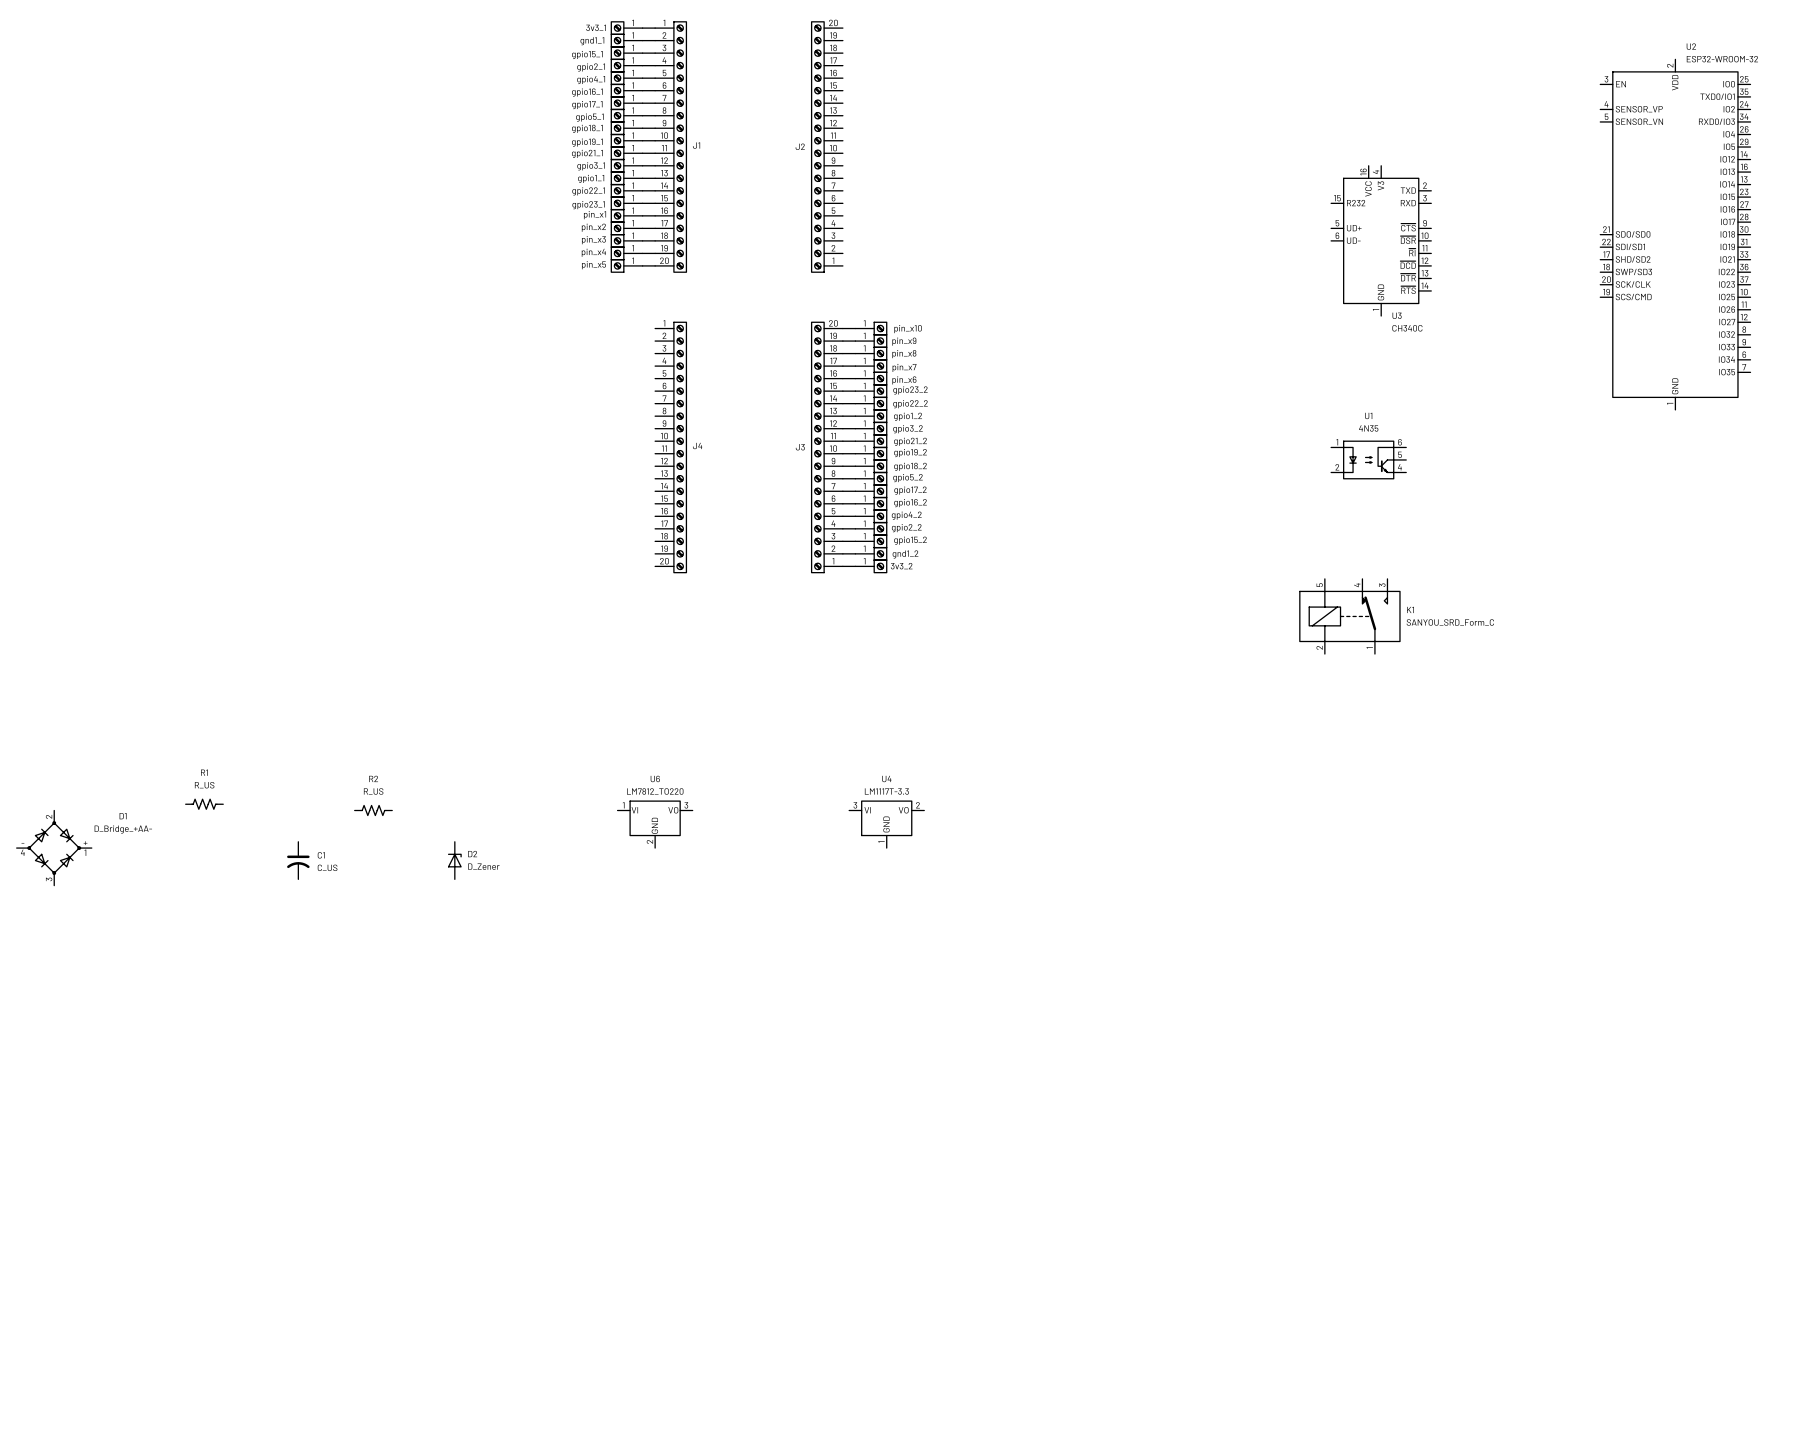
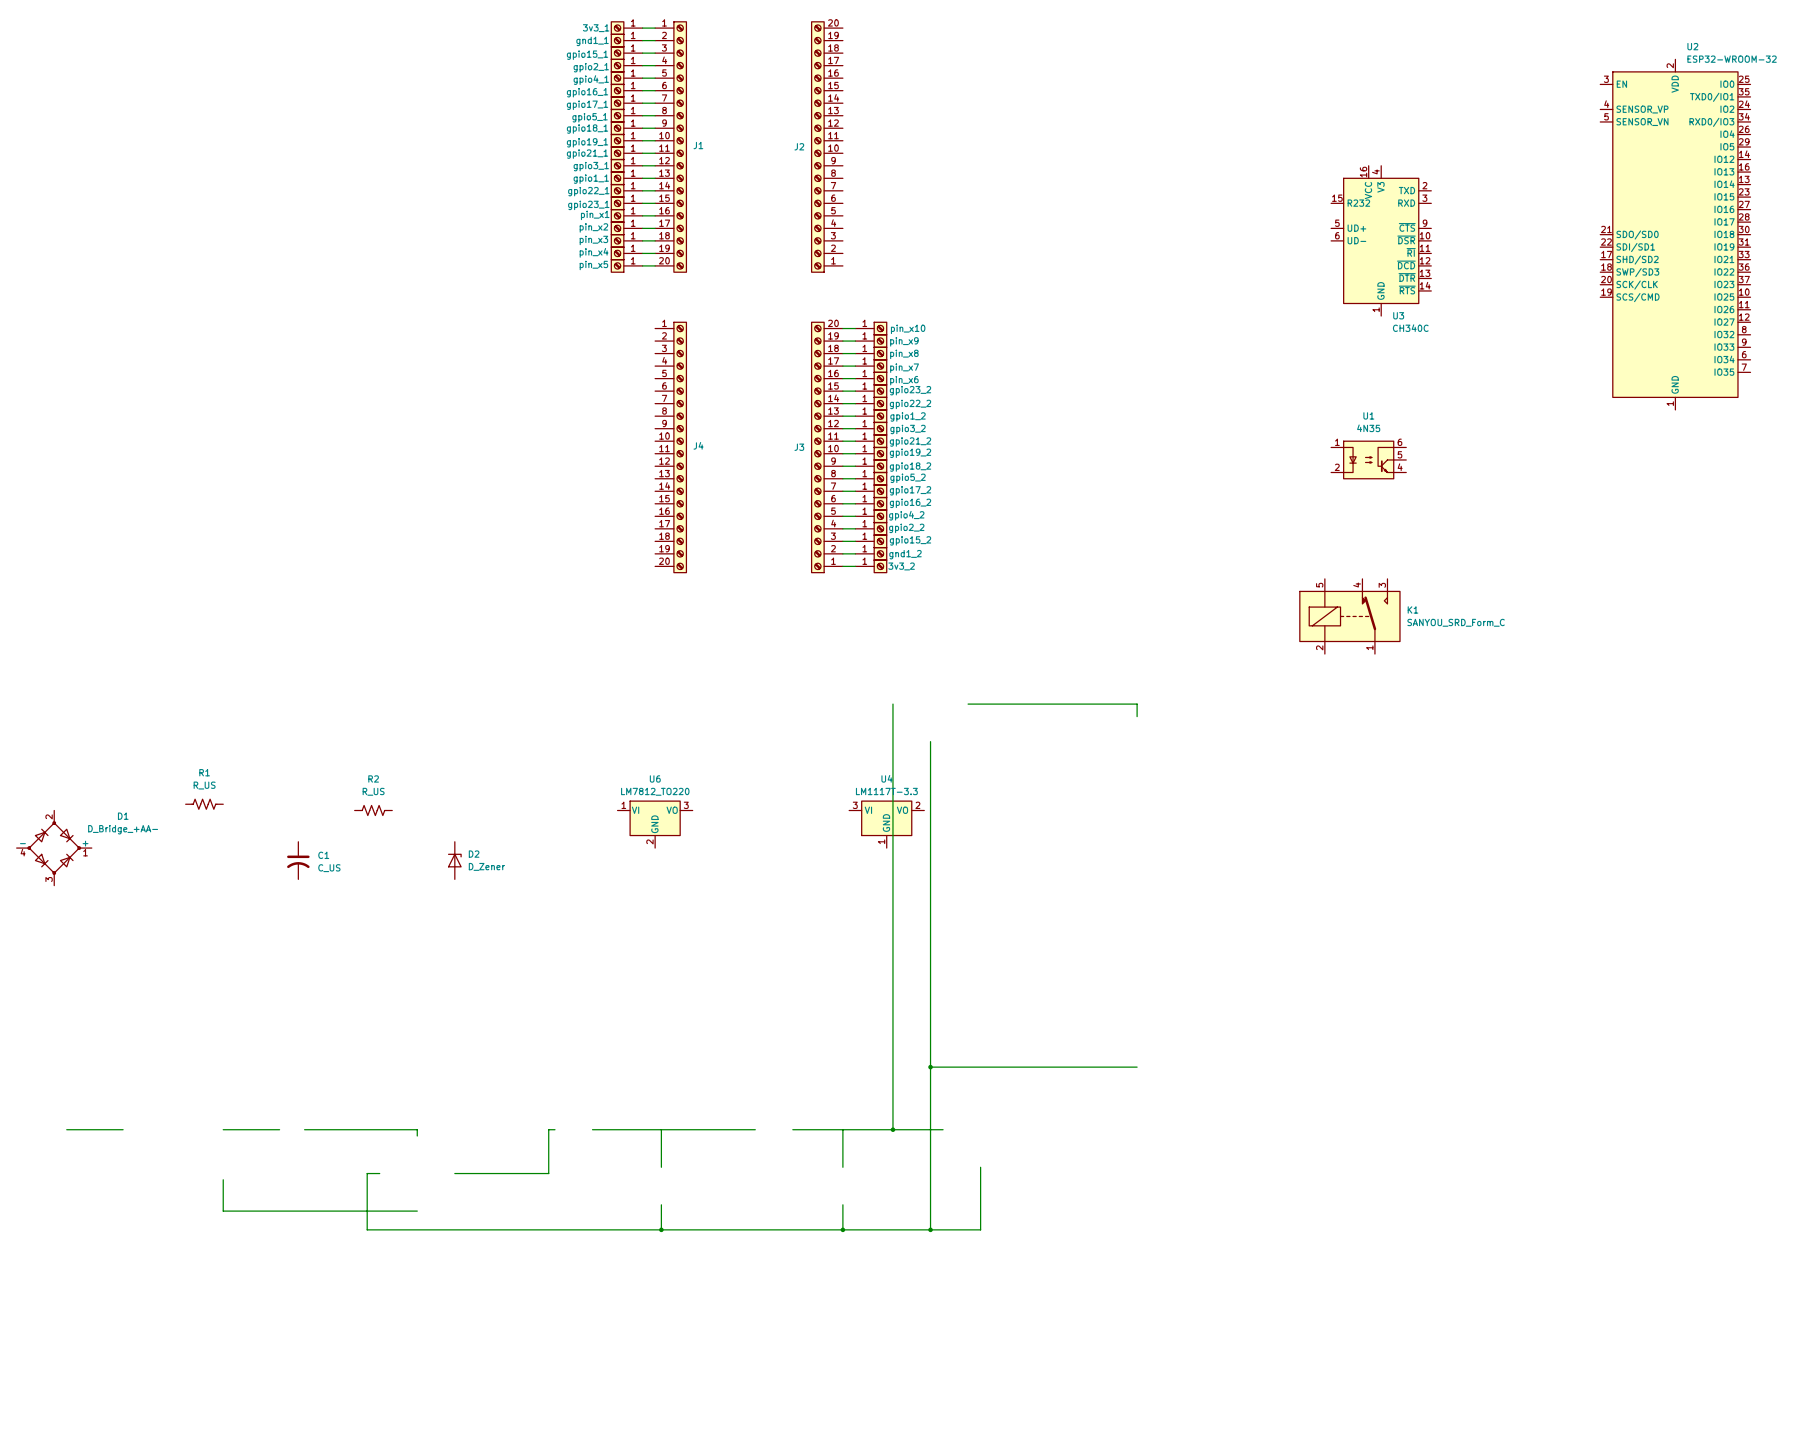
wire: none -> (892, 704) (892, 1129)
wire: none -> (968, 704) (1137, 704) (1137, 716)
wire: none -> (930, 741) (930, 1229)
wire: none -> (930, 1067) (1137, 1067)
junction: none -> (930, 1067)
wire: none -> (66, 1129) (123, 1129)
wire: none -> (223, 1129) (279, 1129)
wire: none -> (304, 1129) (417, 1129) (417, 1135)
wire: none -> (554, 1129) (548, 1129) (548, 1173) (454, 1173)
wire: none -> (592, 1129) (755, 1129)
wire: none -> (661, 1129) (661, 1167)
wire: none -> (792, 1129) (943, 1129)
wire: none -> (842, 1129) (842, 1167)
junction: none -> (892, 1129)
wire: none -> (980, 1167) (980, 1229) (367, 1229) (367, 1173) (379, 1173)
wire: none -> (223, 1179) (223, 1211) (417, 1211)
wire: none -> (661, 1204) (661, 1229)
wire: none -> (842, 1204) (842, 1229)
junction: none -> (661, 1229)
junction: none -> (842, 1229)
junction: none -> (930, 1229)

